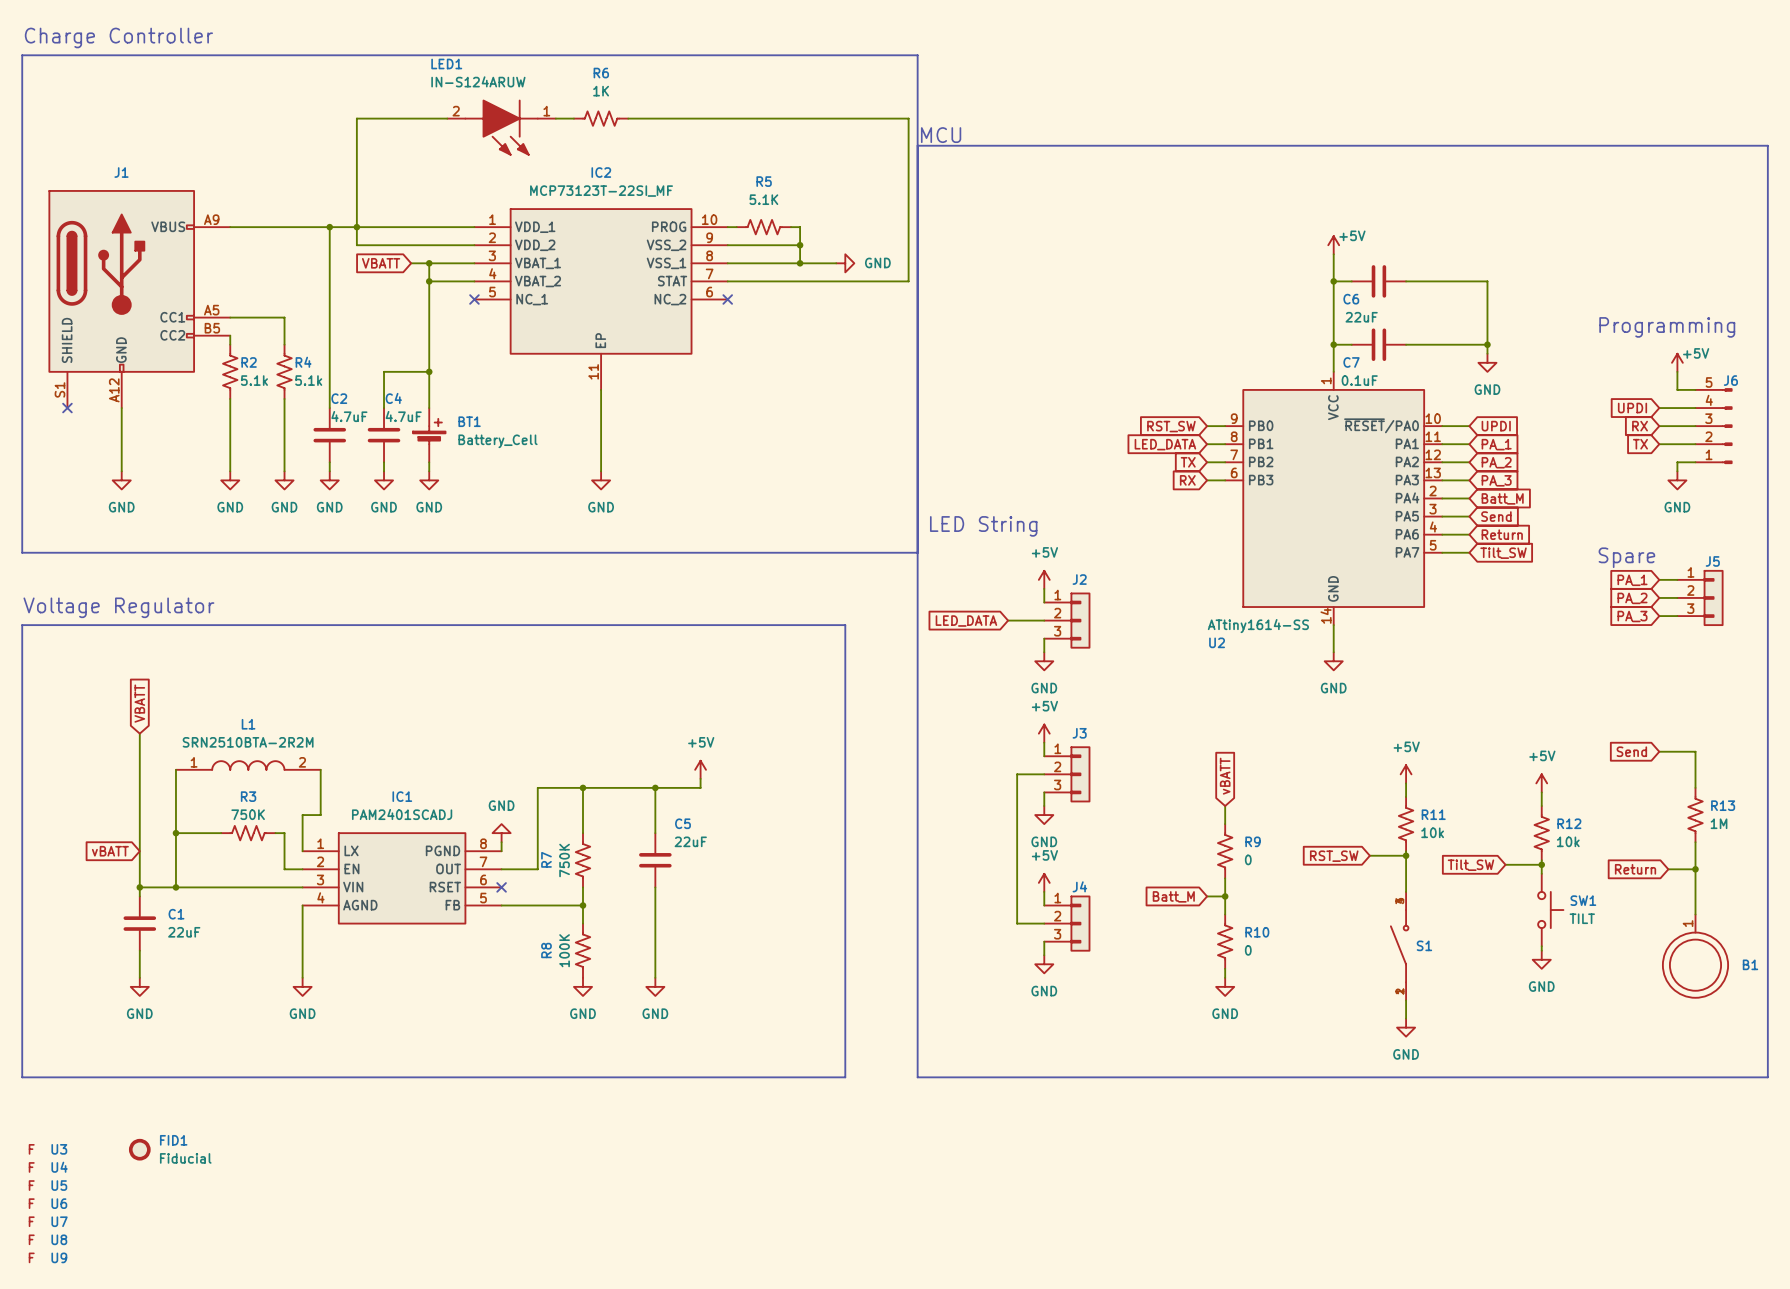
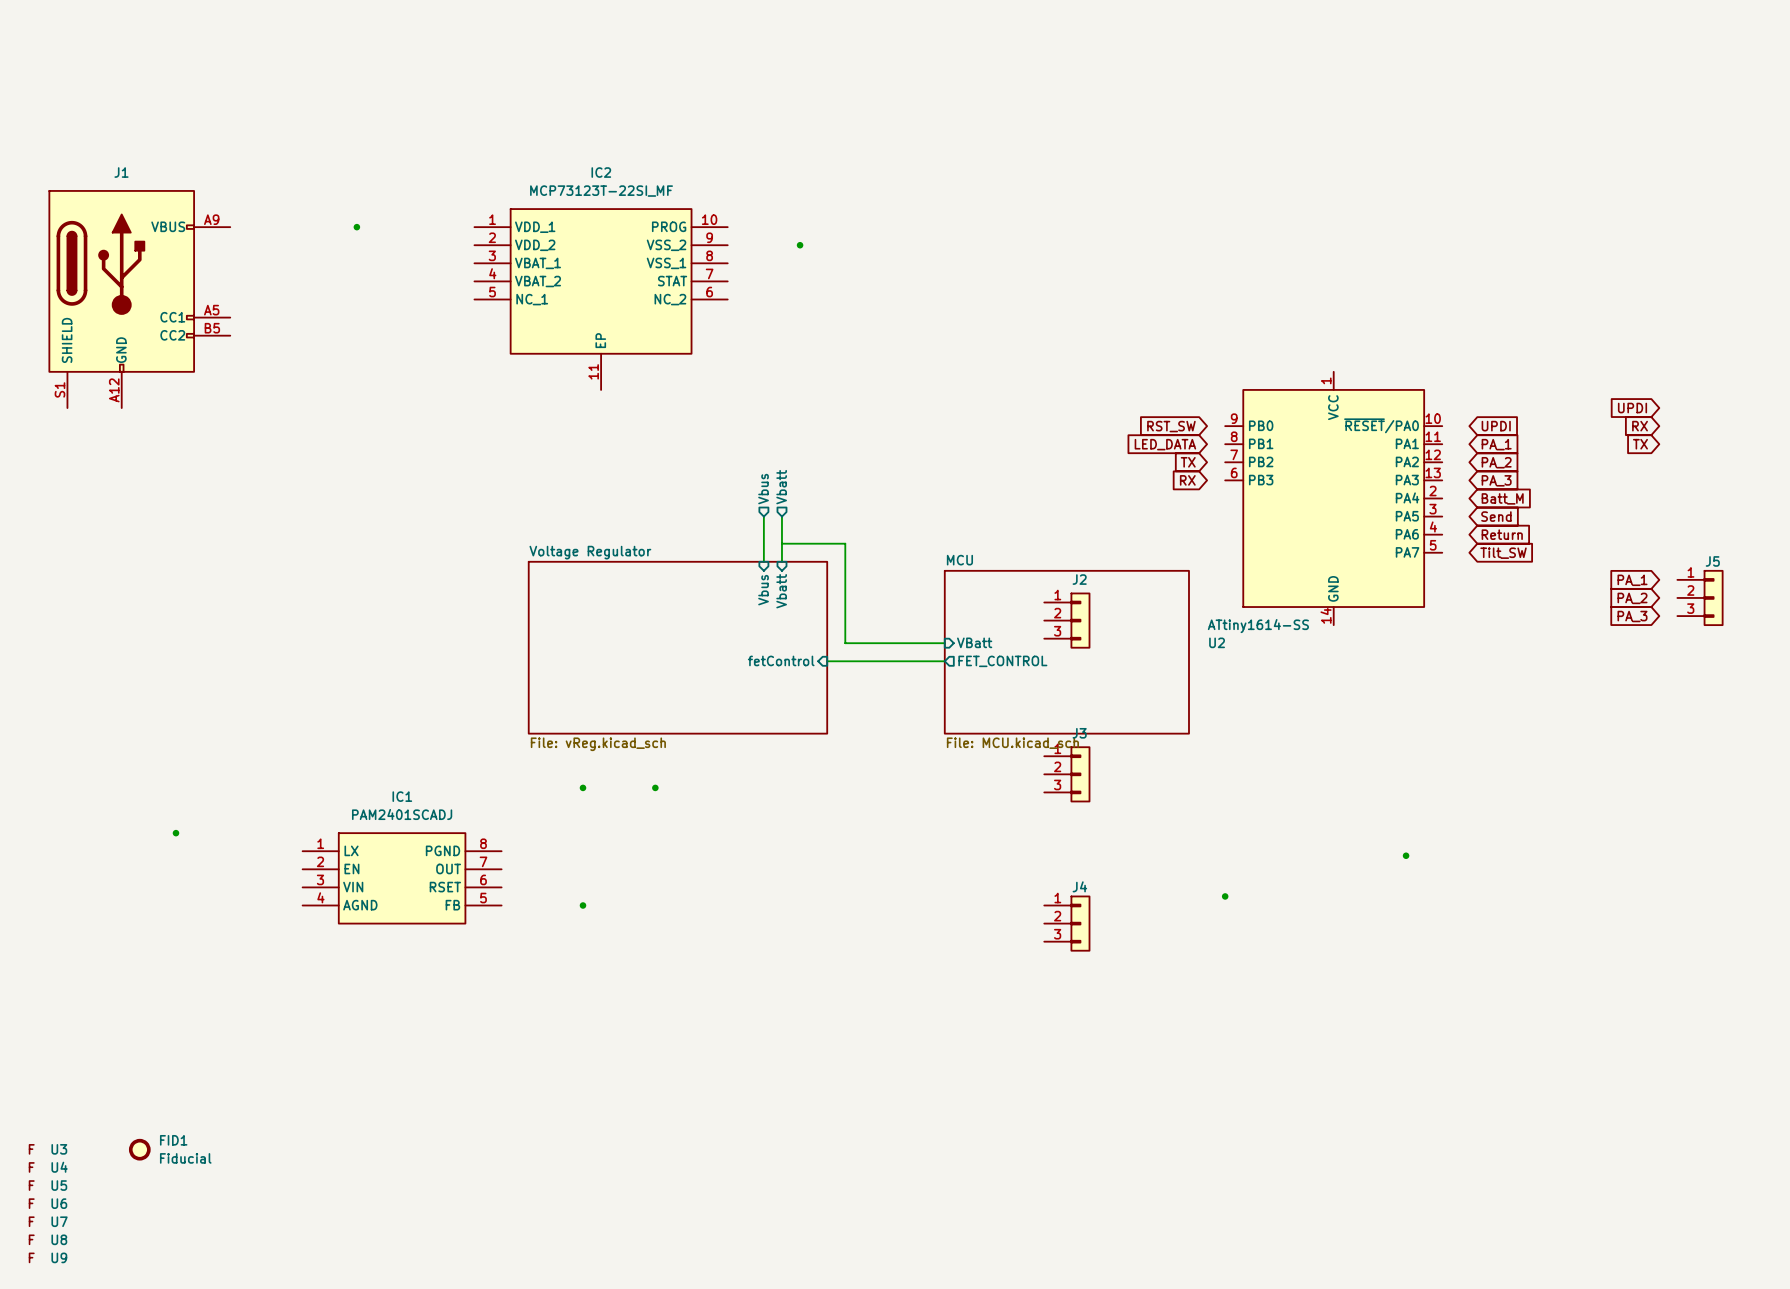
text: Charge Controller (118, 37) -> none
wire: (447, 118) (356, 118) (356, 245) (474, 245) -> none
wire: (555, 118) (573, 118) -> none
R6: 1K (601, 118) -> none
wire: (628, 118) (908, 118) (908, 281) (727, 281) -> none
LED1: IN-S124ARUW (501, 127) -> none
text: MCU (941, 135) -> none
line: (917, 145) (1767, 145) (1767, 1077) (917, 1077) (917, 55) (22, 55) (22, 552) (917, 552) -> none
wire: (230, 227) (474, 227) -> none
wire: (329, 227) (329, 408) -> none
junction: (329, 227) -> none
wire: (727, 227) (736, 227) -> none
R5: 5.1K (763, 227) -> none
wire: (791, 227) (800, 227) (800, 263) -> none
wire: (727, 245) (800, 245) -> none
power symbol: +5V (1333, 245) -> none
wire: (1333, 254) (1333, 371) -> none
global label: VBATT (381, 263) -> none
wire: (411, 263) (474, 263) -> none
wire: (429, 263) (429, 408) -> none
junction: (429, 263) -> none
wire: (727, 263) (836, 263) -> none
junction: (800, 263) -> none
power symbol: GND (845, 263) -> none
wire: (429, 281) (474, 281) -> none
junction: (429, 281) -> none
wire: (1333, 281) (1351, 281) -> none
junction: (1333, 281) -> none
C6: 22uF (1378, 281) -> none
wire: (1406, 281) (1487, 281) (1487, 353) -> none
no-connect mark: (474, 299) -> none
no-connect mark: (727, 299) -> none
wire: (230, 317) (284, 317) (284, 344) -> none
text: Programming (1667, 327) -> none
wire: (230, 335) (230, 344) -> none
wire: (1333, 344) (1351, 344) -> none
junction: (1333, 344) -> none
C7: 0.1uF (1378, 344) -> none
wire: (1406, 344) (1487, 344) -> none
junction: (1487, 344) -> none
power symbol: GND (1487, 362) -> none
power symbol: +5V (1677, 362) -> none
R2: 5.1k (230, 371) -> none
R4: 5.1k (284, 371) -> none
wire: (429, 371) (384, 371) (384, 408) -> none
junction: (429, 371) -> none
wire: (1677, 371) (1677, 389) (1695, 389) -> none
wire: (601, 389) (601, 471) -> none
wire: (230, 398) (230, 471) -> none
wire: (284, 398) (284, 471) -> none
no-connect mark: (67, 408) -> none
wire: (121, 408) (121, 471) -> none
wire: (1659, 408) (1695, 408) -> none
wire: (1207, 426) (1225, 426) -> none
wire: (1442, 426) (1469, 426) -> none
wire: (1659, 426) (1695, 426) -> none
J6: (1713, 426) -> none
C2: 4.7uF (329, 435) -> none
C4: 4.7uF (384, 435) -> none
BT1: Battery_Cell (429, 435) -> none
wire: (1207, 444) (1225, 444) -> none
wire: (1442, 444) (1469, 444) -> none
wire: (1659, 444) (1695, 444) -> none
wire: (329, 462) (329, 471) -> none
wire: (384, 462) (384, 471) -> none
wire: (429, 462) (429, 471) -> none
wire: (1207, 462) (1225, 462) -> none
wire: (1442, 462) (1469, 462) -> none
wire: (1695, 462) (1677, 462) (1677, 471) -> none
power symbol: GND (121, 480) -> none
power symbol: GND (230, 480) -> none
power symbol: GND (284, 480) -> none
power symbol: GND (329, 480) -> none
power symbol: GND (384, 480) -> none
power symbol: GND (429, 480) -> none
power symbol: GND (601, 480) -> none
wire: (1207, 480) (1225, 480) -> none
wire: (1442, 480) (1469, 480) -> none
power symbol: GND (1677, 480) -> none
sheet pin: none -> Vbatt (781, 487)
sheet pin: none -> Vbus (763, 489)
wire: (1442, 498) (1469, 498) -> none
wire: none -> (763, 516) (763, 561)
wire: none -> (781, 516) (781, 561)
wire: (1442, 516) (1469, 516) -> none
text: LED String (983, 526) -> none
wire: (1442, 534) (1469, 534) -> none
wire: none -> (781, 543) (845, 543) (845, 643) (944, 643)
wire: (1442, 552) (1469, 552) -> none
text: Spare (1626, 557) -> none
power symbol: +5V (1044, 579) -> none
wire: (1659, 579) (1677, 579) -> none
wire: (1044, 588) (1044, 602) -> none
sheet pin: none -> Vbus (763, 590)
sheet pin: none -> Vbatt (781, 591)
wire: (1659, 597) (1677, 597) -> none
text: Voltage Regulator (118, 607) -> none
wire: (1659, 616) (1677, 616) -> none
wire: (1008, 620) (1044, 620) -> none
global label: LED_DATA (966, 621) -> none
line: (22, 625) (845, 625) (845, 1077) (22, 1077) (22, 625) -> none
wire: (1333, 625) (1333, 652) -> none
wire: (1044, 638) (1044, 652) -> none
sheet pin: none -> VBatt (974, 642)
sheet Voltage Regulator: none -> File: vReg.kicad_sch (677, 647)
sheet MCU: none -> File: MCU.kicad_sch (1066, 652)
sheet pin: none -> fetControl (781, 660)
wire: none -> (827, 661) (944, 661)
sheet pin: none -> FET_CONTROL (1002, 661)
power symbol: GND (1044, 661) -> none
power symbol: GND (1333, 661) -> none
global label: VBATT (139, 703) -> none
wire: (139, 733) (139, 896) -> none
power symbol: +5V (1044, 733) -> none
wire: (1044, 742) (1044, 756) -> none
global label: Send (1631, 751) -> none
wire: (1659, 751) (1695, 751) (1695, 787) -> none
L1: SRN2510BTA-2R2M (248, 765) -> none
wire: (175, 769) (175, 887) -> none
wire: (320, 769) (320, 815) (302, 815) (302, 851) -> none
power symbol: +5V (700, 769) -> none
wire: (1044, 774) (1017, 774) (1017, 923) (1044, 923) -> none
power symbol: +5V (1406, 774) -> none
global label: vBATT (1225, 776) -> none
wire: (700, 778) (700, 787) (537, 787) (537, 869) (501, 869) -> none
wire: (1406, 783) (1406, 796) -> none
power symbol: +5V (1541, 783) -> none
wire: (582, 787) (582, 833) -> none
wire: (655, 787) (655, 833) -> none
wire: (1044, 792) (1044, 806) -> none
wire: (1541, 792) (1541, 806) -> none
wire: (1225, 806) (1225, 824) -> none
power symbol: GND (1044, 815) -> none
R13: 1M (1695, 815) -> none
R11: 10k (1406, 824) -> none
wire: (175, 833) (221, 833) -> none
R3: 750K (248, 833) -> none
wire: (275, 833) (284, 833) (284, 869) (302, 869) -> none
power symbol: GND (501, 833) -> none
R12: 10k (1541, 833) -> none
wire: (501, 842) (501, 851) -> none
wire: (1695, 842) (1695, 914) -> none
global label: vBATT (110, 851) -> none
R9: 0 (1225, 851) -> none
wire: (1406, 851) (1406, 891) -> none
wire: (1369, 855) (1406, 855) -> none
global label: RST_SW (1334, 856) -> none
R7: 750K (582, 860) -> none
C5: 22uF (655, 860) -> none
wire: (1541, 860) (1541, 873) -> none
wire: (1505, 864) (1541, 864) -> none
junction: (1541, 864) -> none
global label: Tilt_SW (1470, 865) -> none
global label: Return (1635, 869) -> none
wire: (1668, 869) (1695, 869) -> none
junction: (1695, 869) -> none
wire: (1225, 878) (1225, 914) -> none
power symbol: +5V (1044, 882) -> none
wire: (139, 887) (302, 887) -> none
junction: (139, 887) -> none
junction: (175, 887) -> none
no-connect mark: (501, 887) -> none
wire: (582, 887) (582, 923) -> none
wire: (655, 887) (655, 977) -> none
wire: (1044, 891) (1044, 905) -> none
global label: Batt_M (1173, 896) -> none
wire: (1207, 896) (1225, 896) -> none
wire: (302, 905) (302, 977) -> none
wire: (501, 905) (582, 905) -> none
SW1: TILT (1550, 910) -> none
C1: 22uF (139, 923) -> none
wire: (1044, 941) (1044, 955) -> none
R10: 0 (1225, 941) -> none
S1: (1399, 946) -> none
wire: (1541, 946) (1541, 950) -> none
wire: (139, 950) (139, 977) -> none
R8: 100K (582, 950) -> none
B1: (1695, 956) -> none
power symbol: GND (1541, 959) -> none
power symbol: GND (1044, 964) -> none
wire: (1225, 968) (1225, 977) -> none
power symbol: GND (139, 986) -> none
power symbol: GND (302, 986) -> none
power symbol: GND (582, 986) -> none
power symbol: GND (655, 986) -> none
power symbol: GND (1225, 986) -> none
wire: (1406, 1000) (1406, 1018) -> none
power symbol: GND (1406, 1027) -> none

